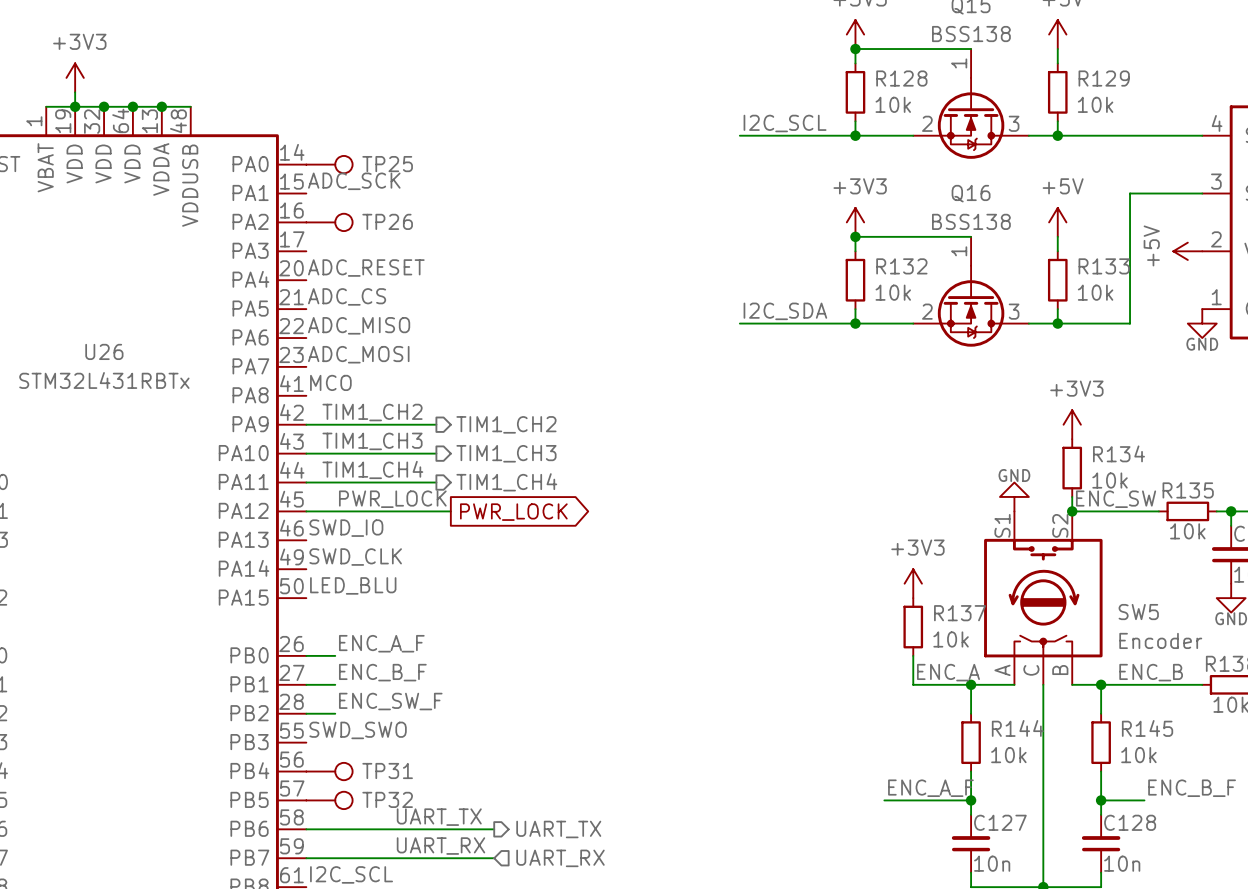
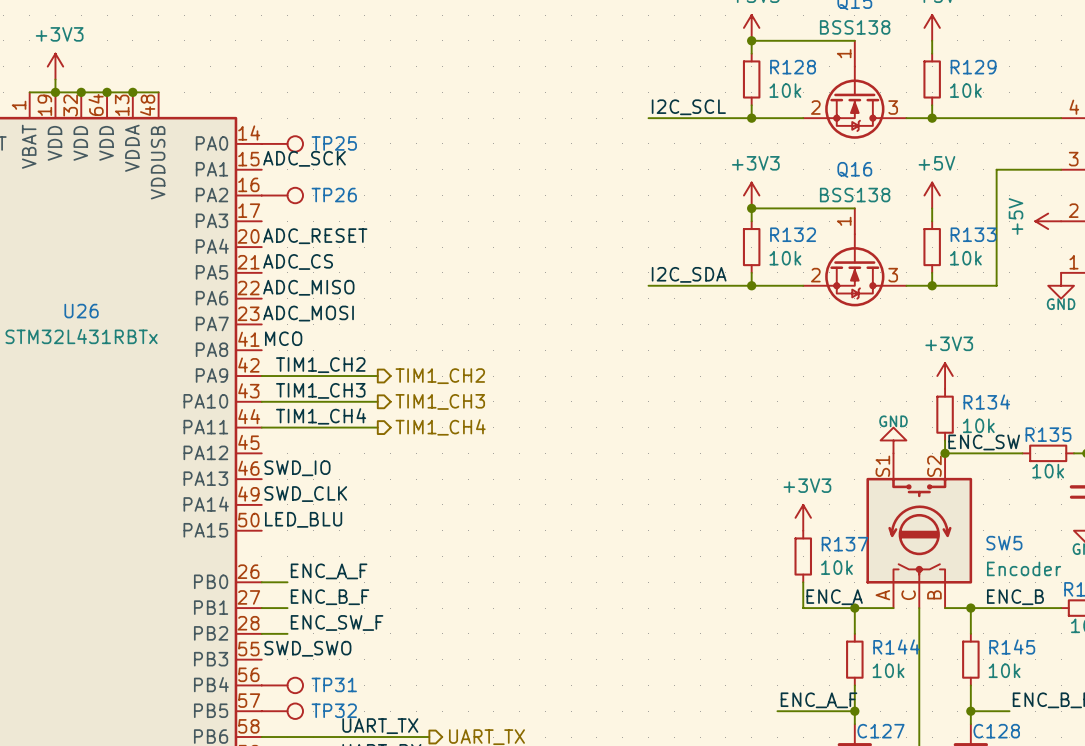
label: PWR_LOCK (392, 499) -> none
wire: (306, 511) (450, 511) -> none
global label: PWR_LOCK (513, 512) -> none

